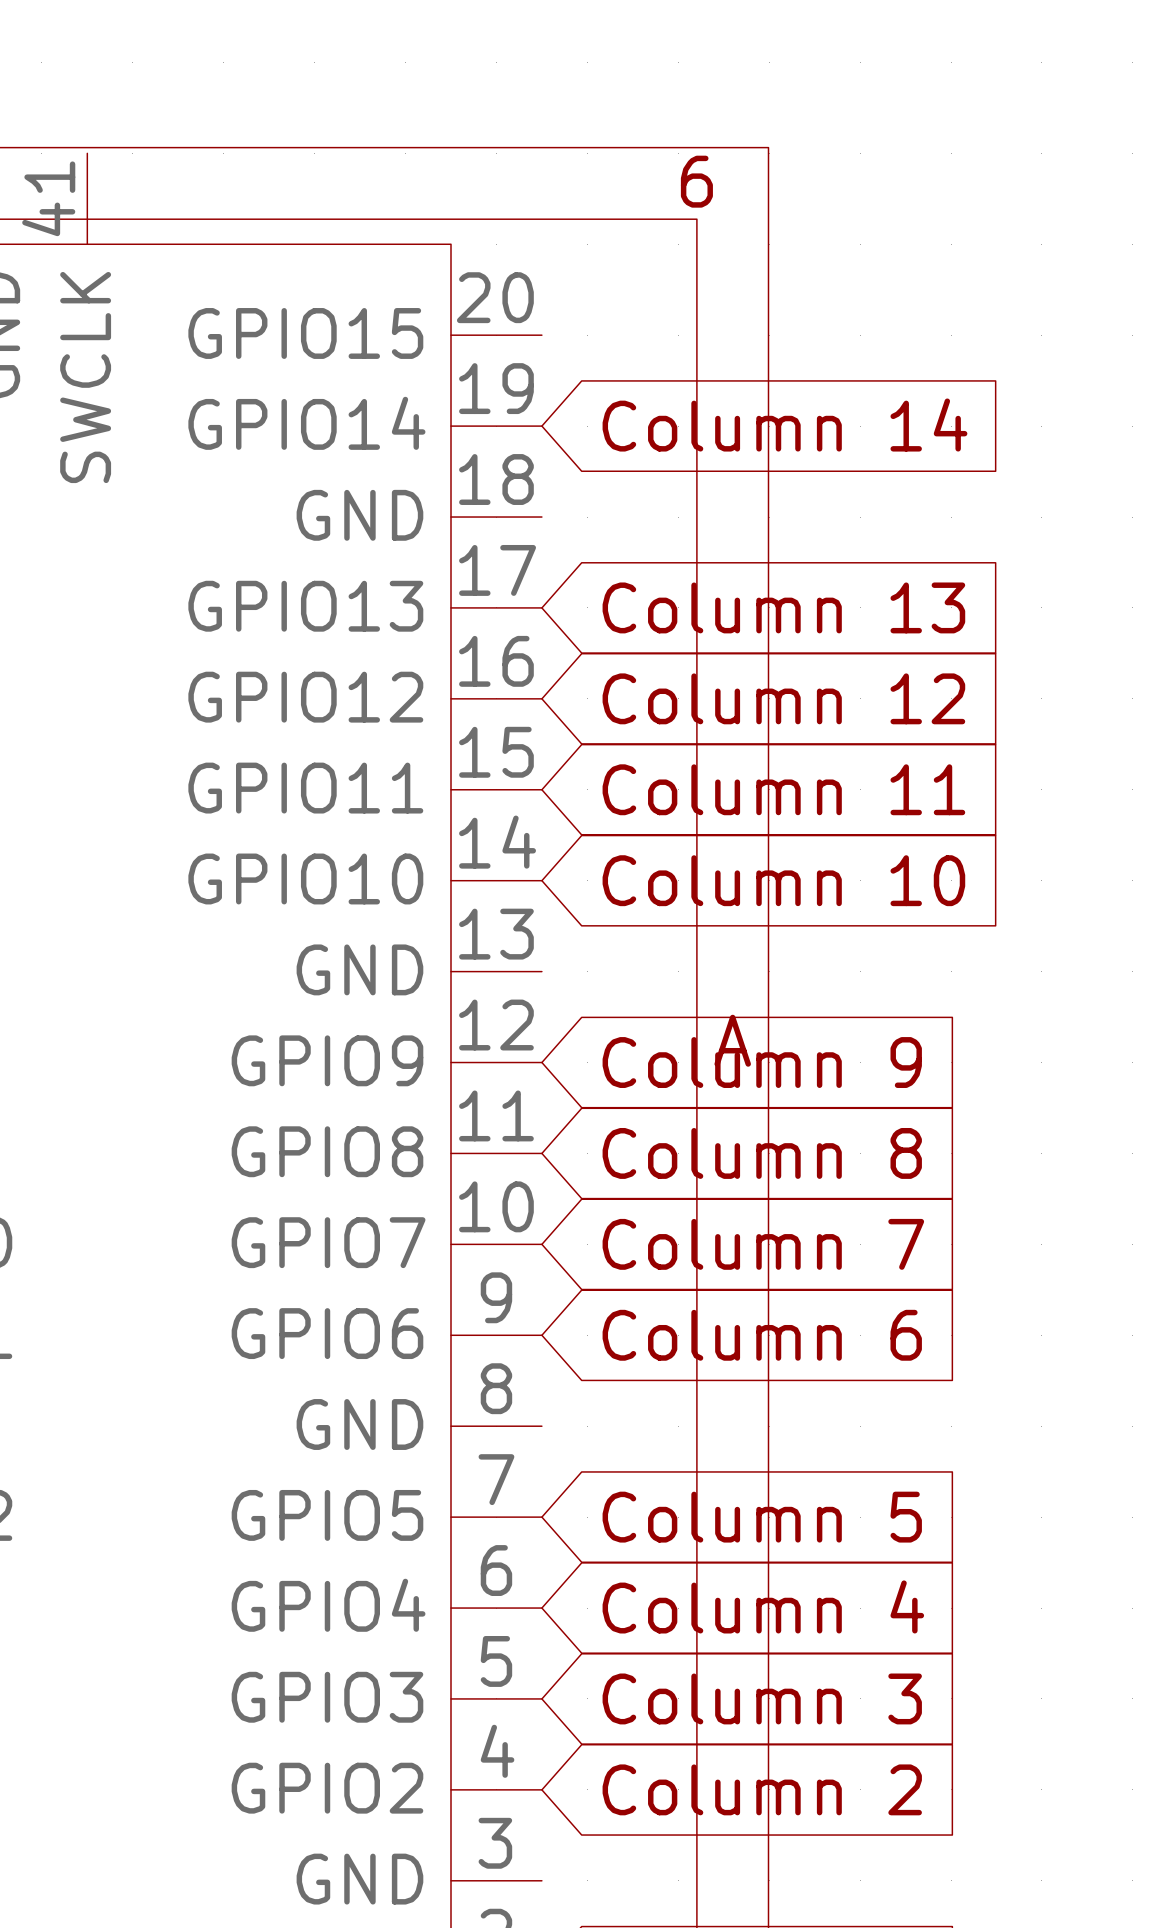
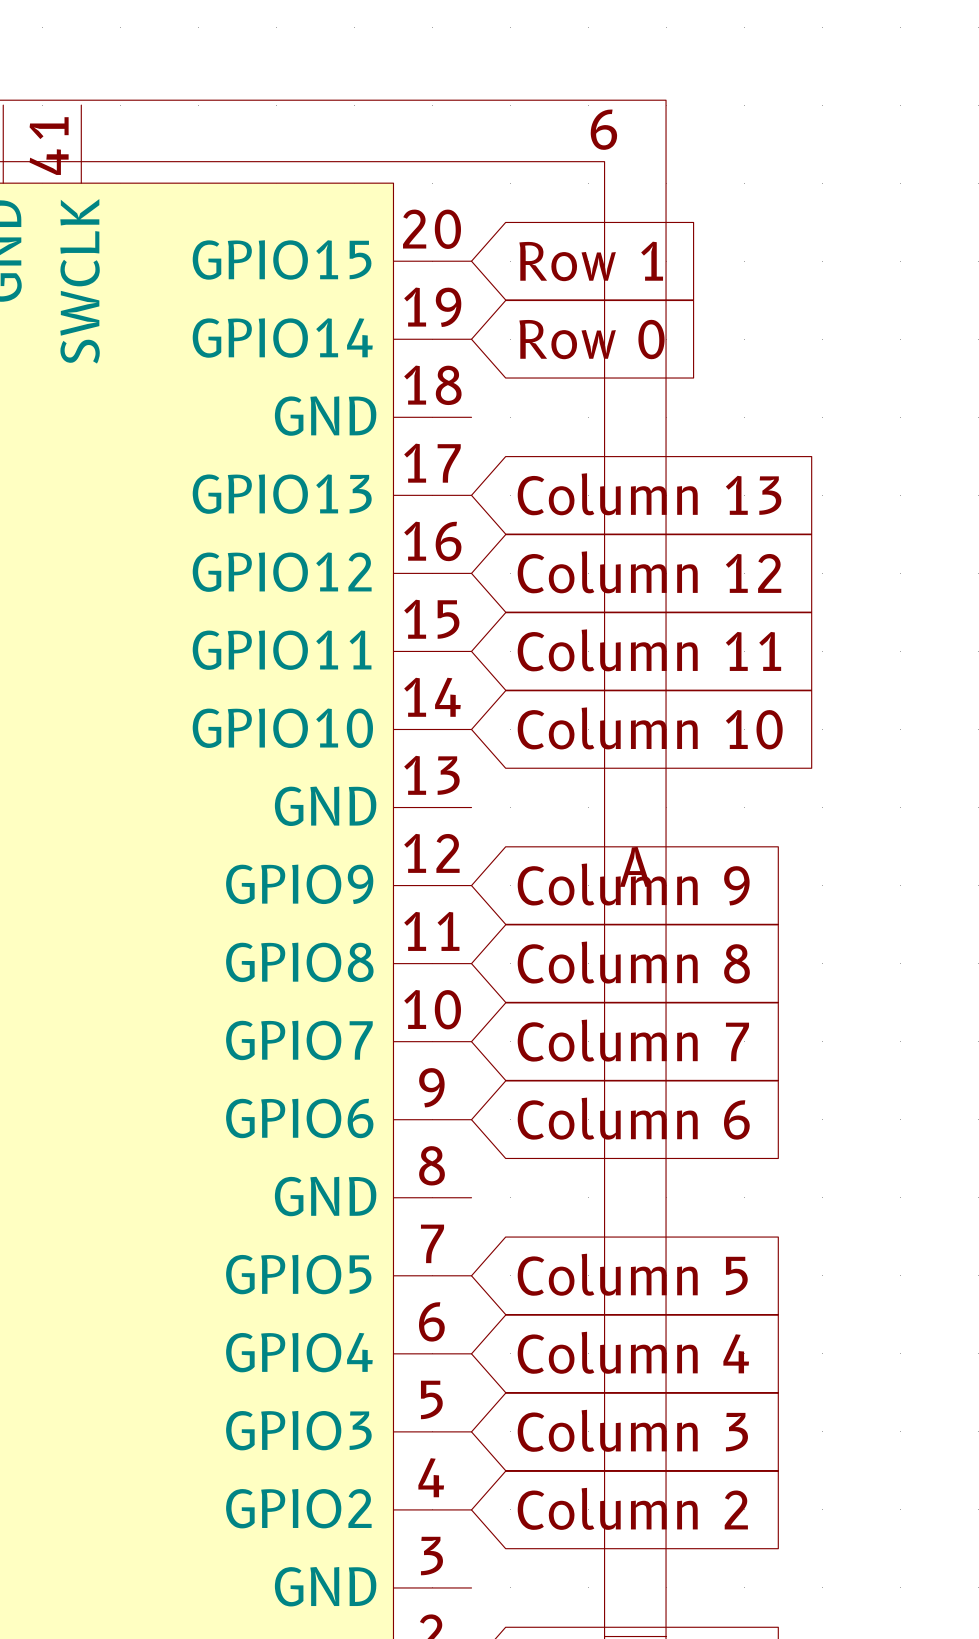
global label: none -> Row 1 (591, 261)
global label: Column 14 (784, 425) -> Row 0 (591, 339)

